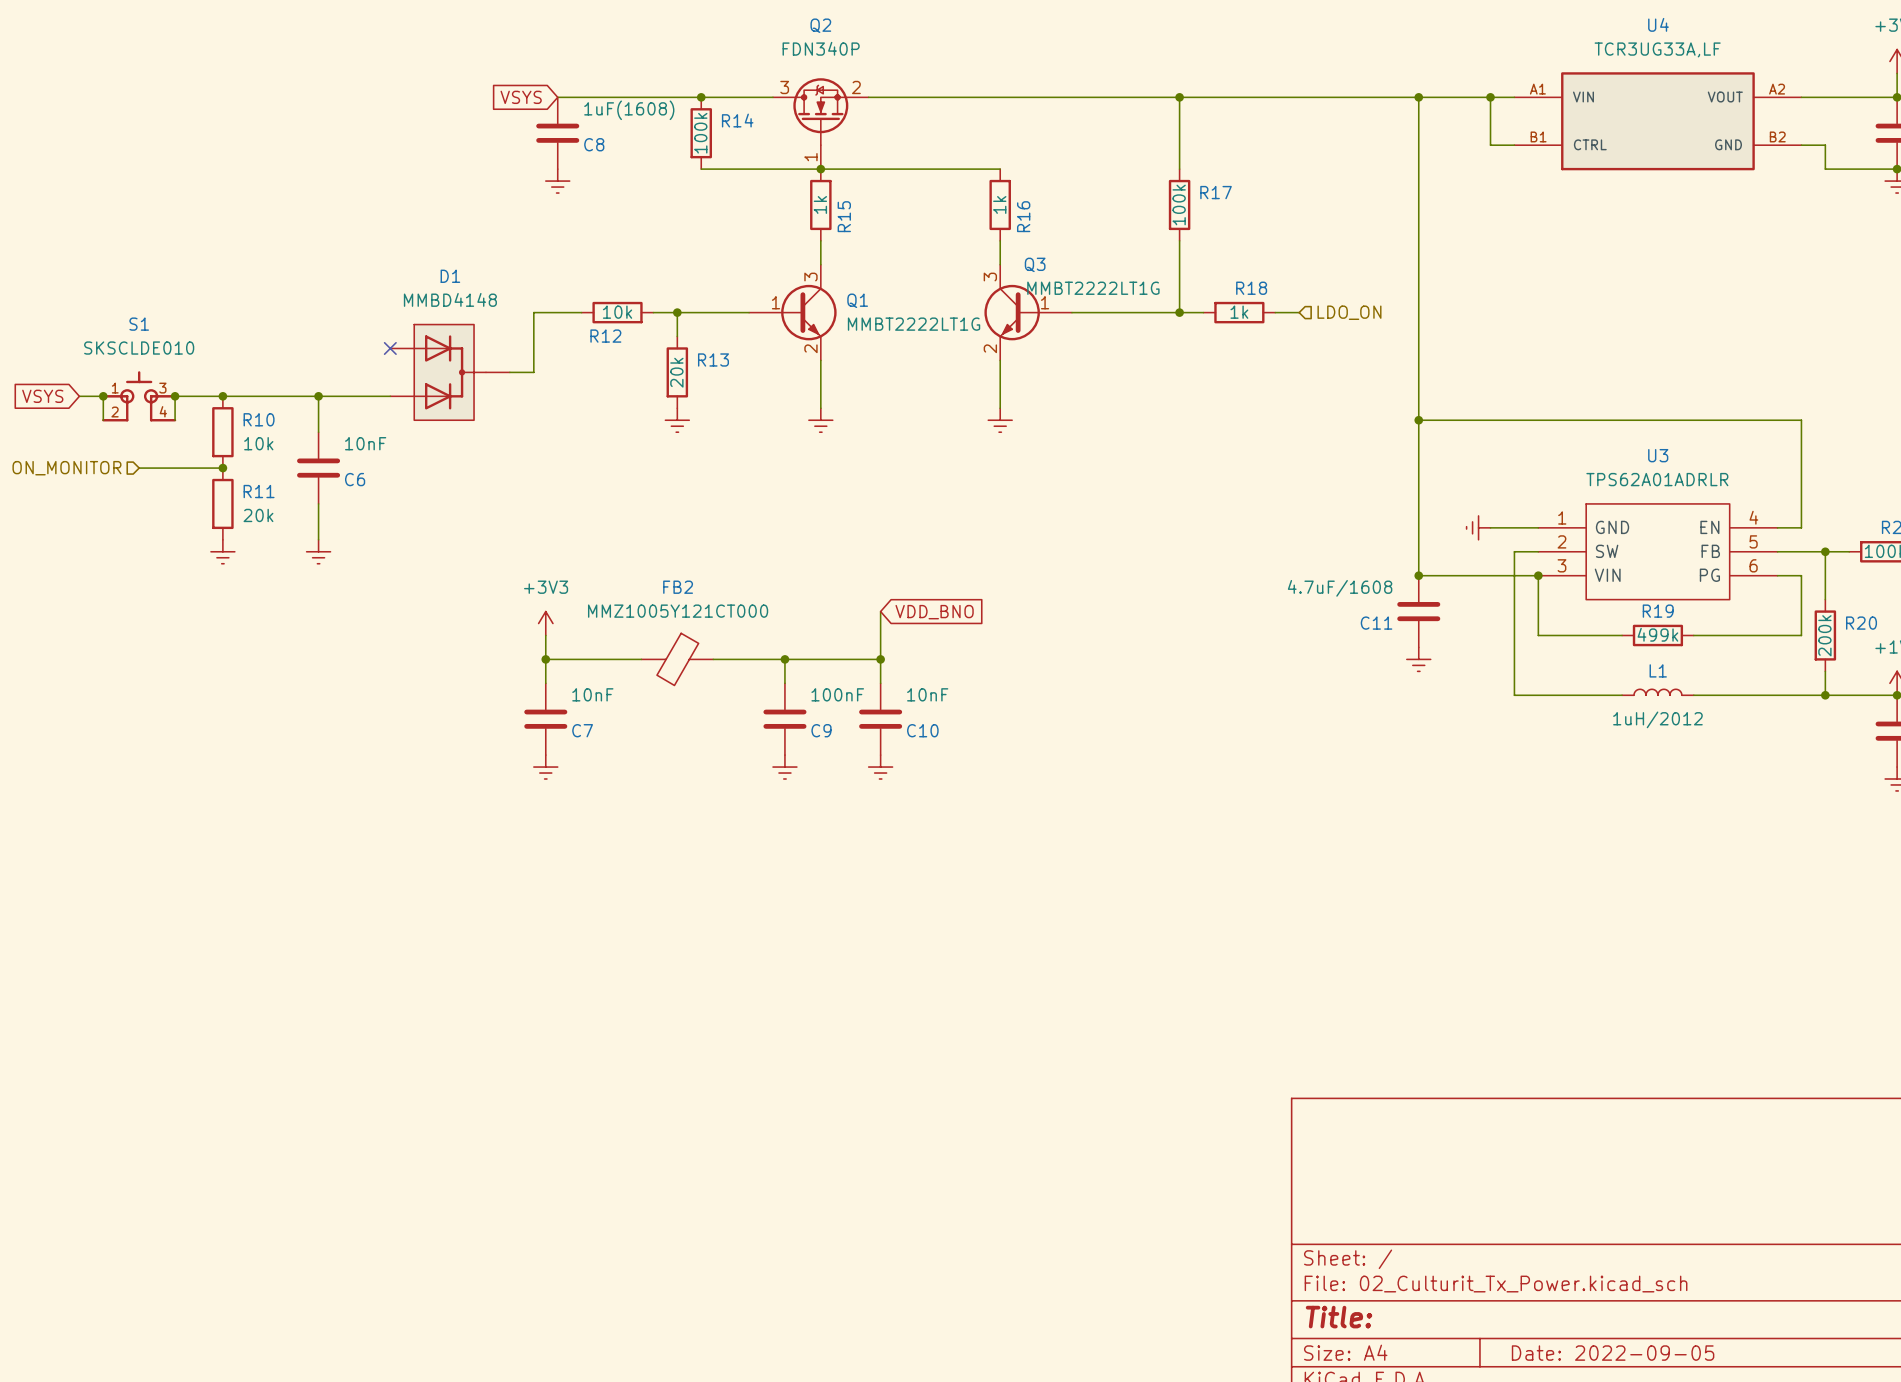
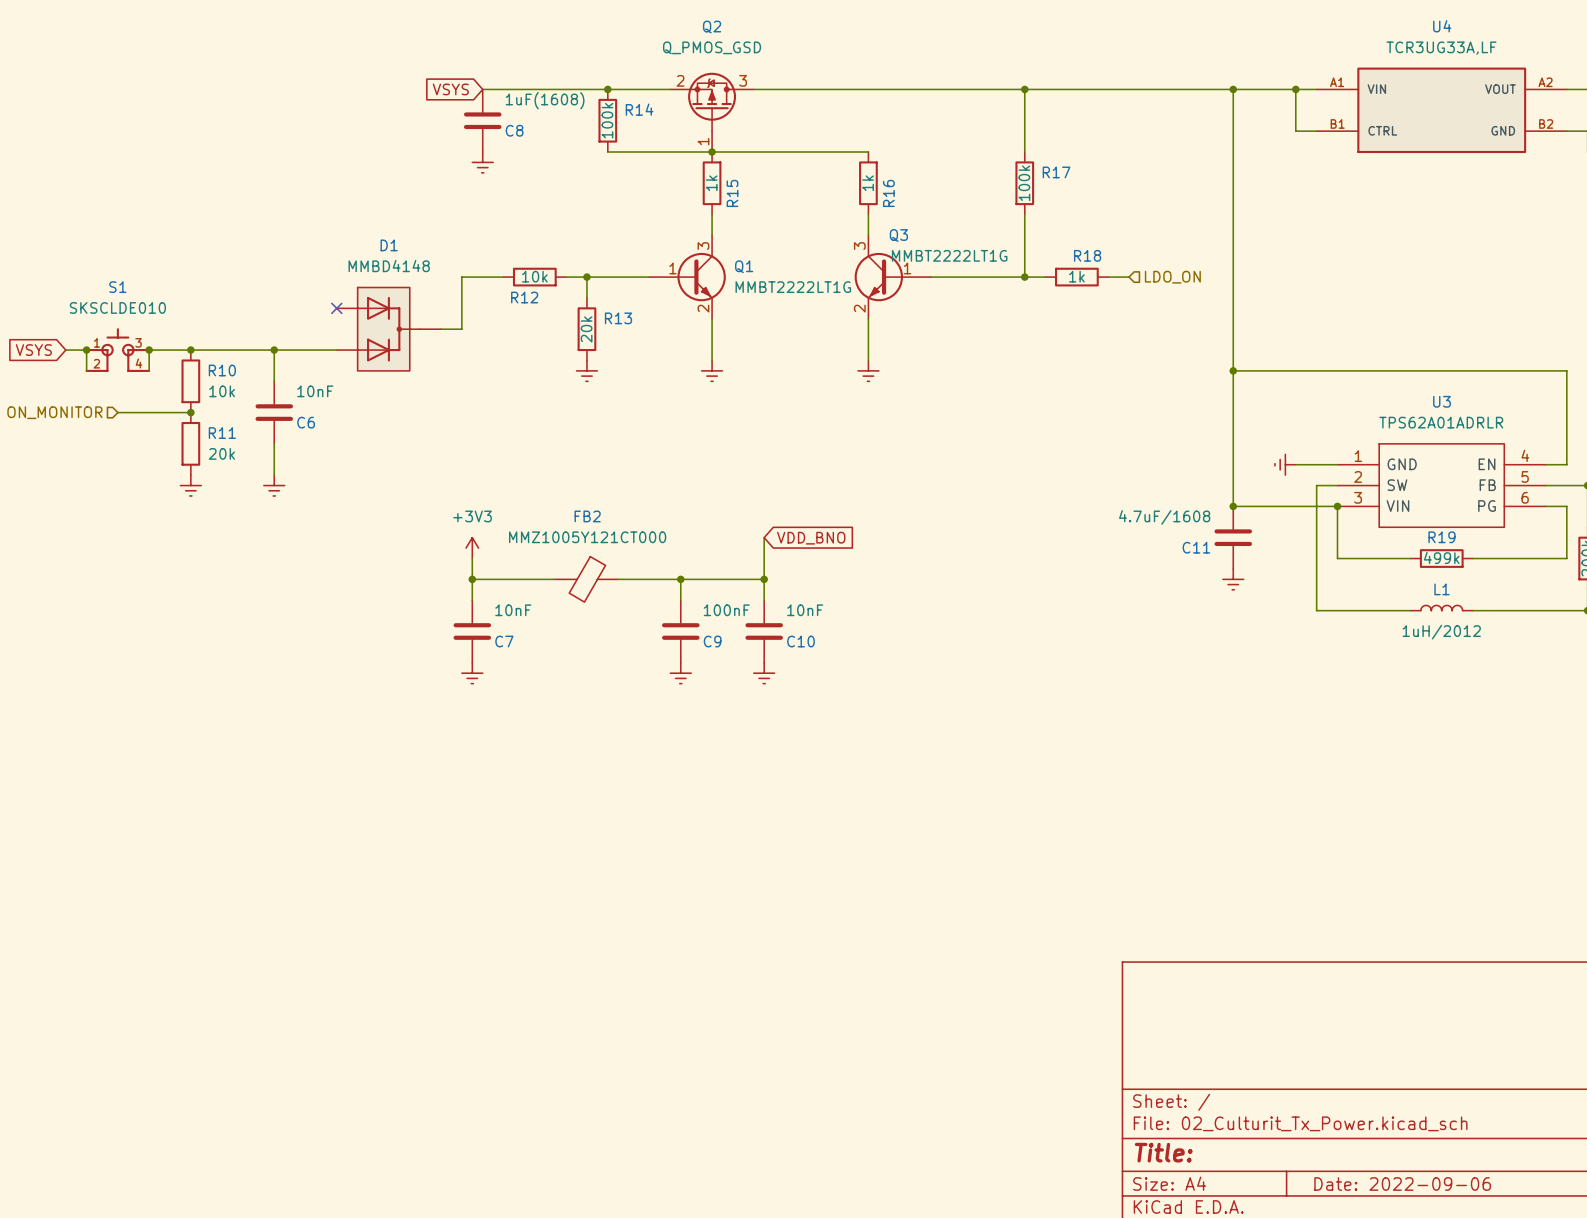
Q2 value: FDN340P (821, 48) -> Q_PMOS_GSD (712, 47)
Q2 symbol: [772, 78, 869, 170] -> [670, 72, 754, 152]
title block: Date: 2022-09-05 (1613, 1353) -> Date: 2022-09-06 (1402, 1184)

